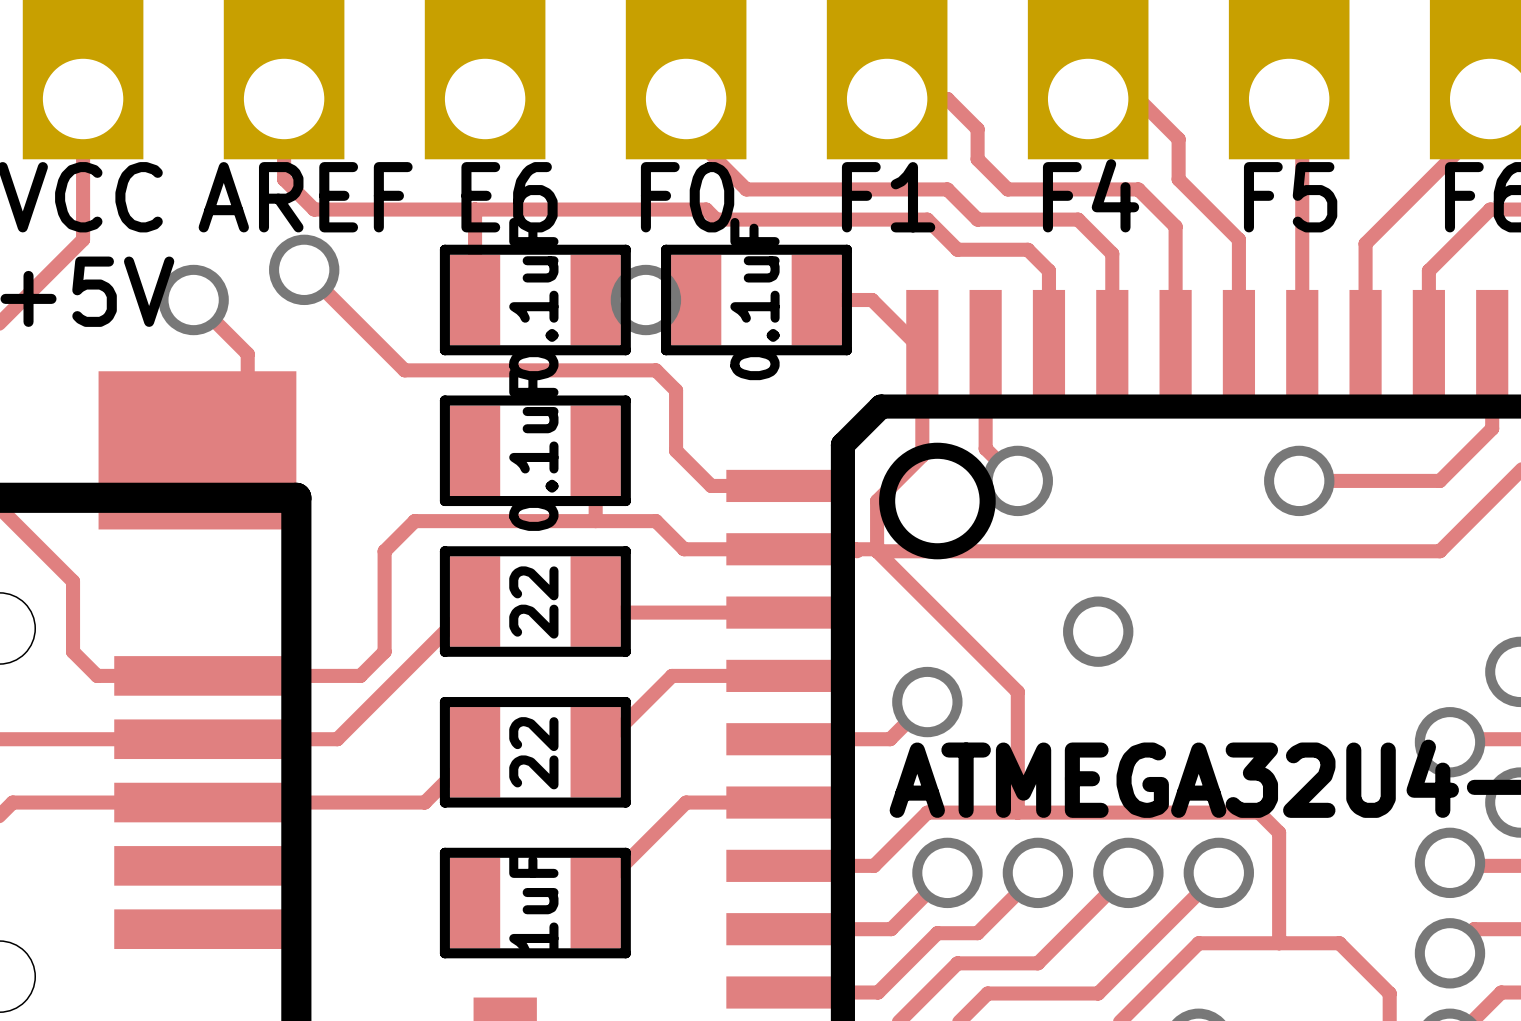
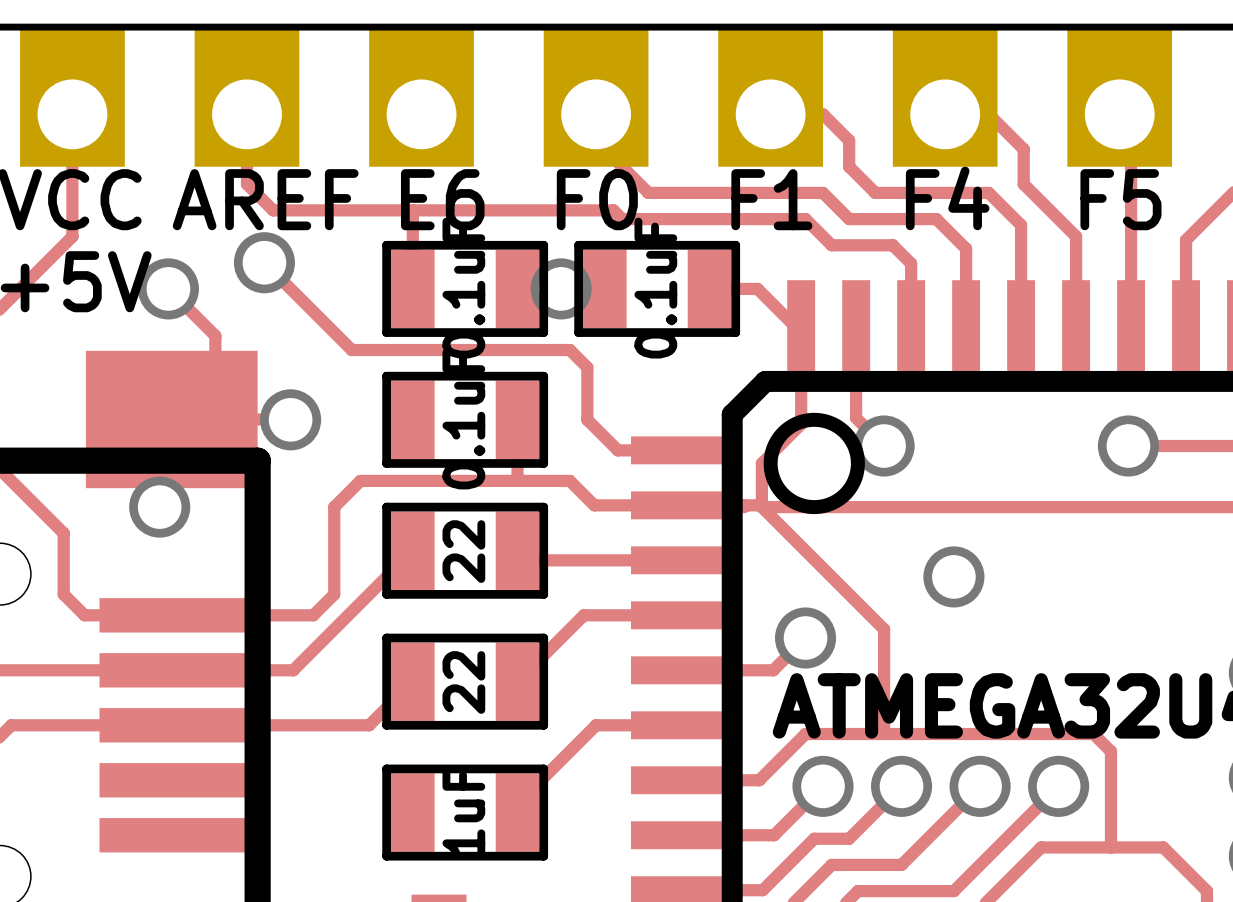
via: none -> (290, 419)
via: none -> (159, 507)

